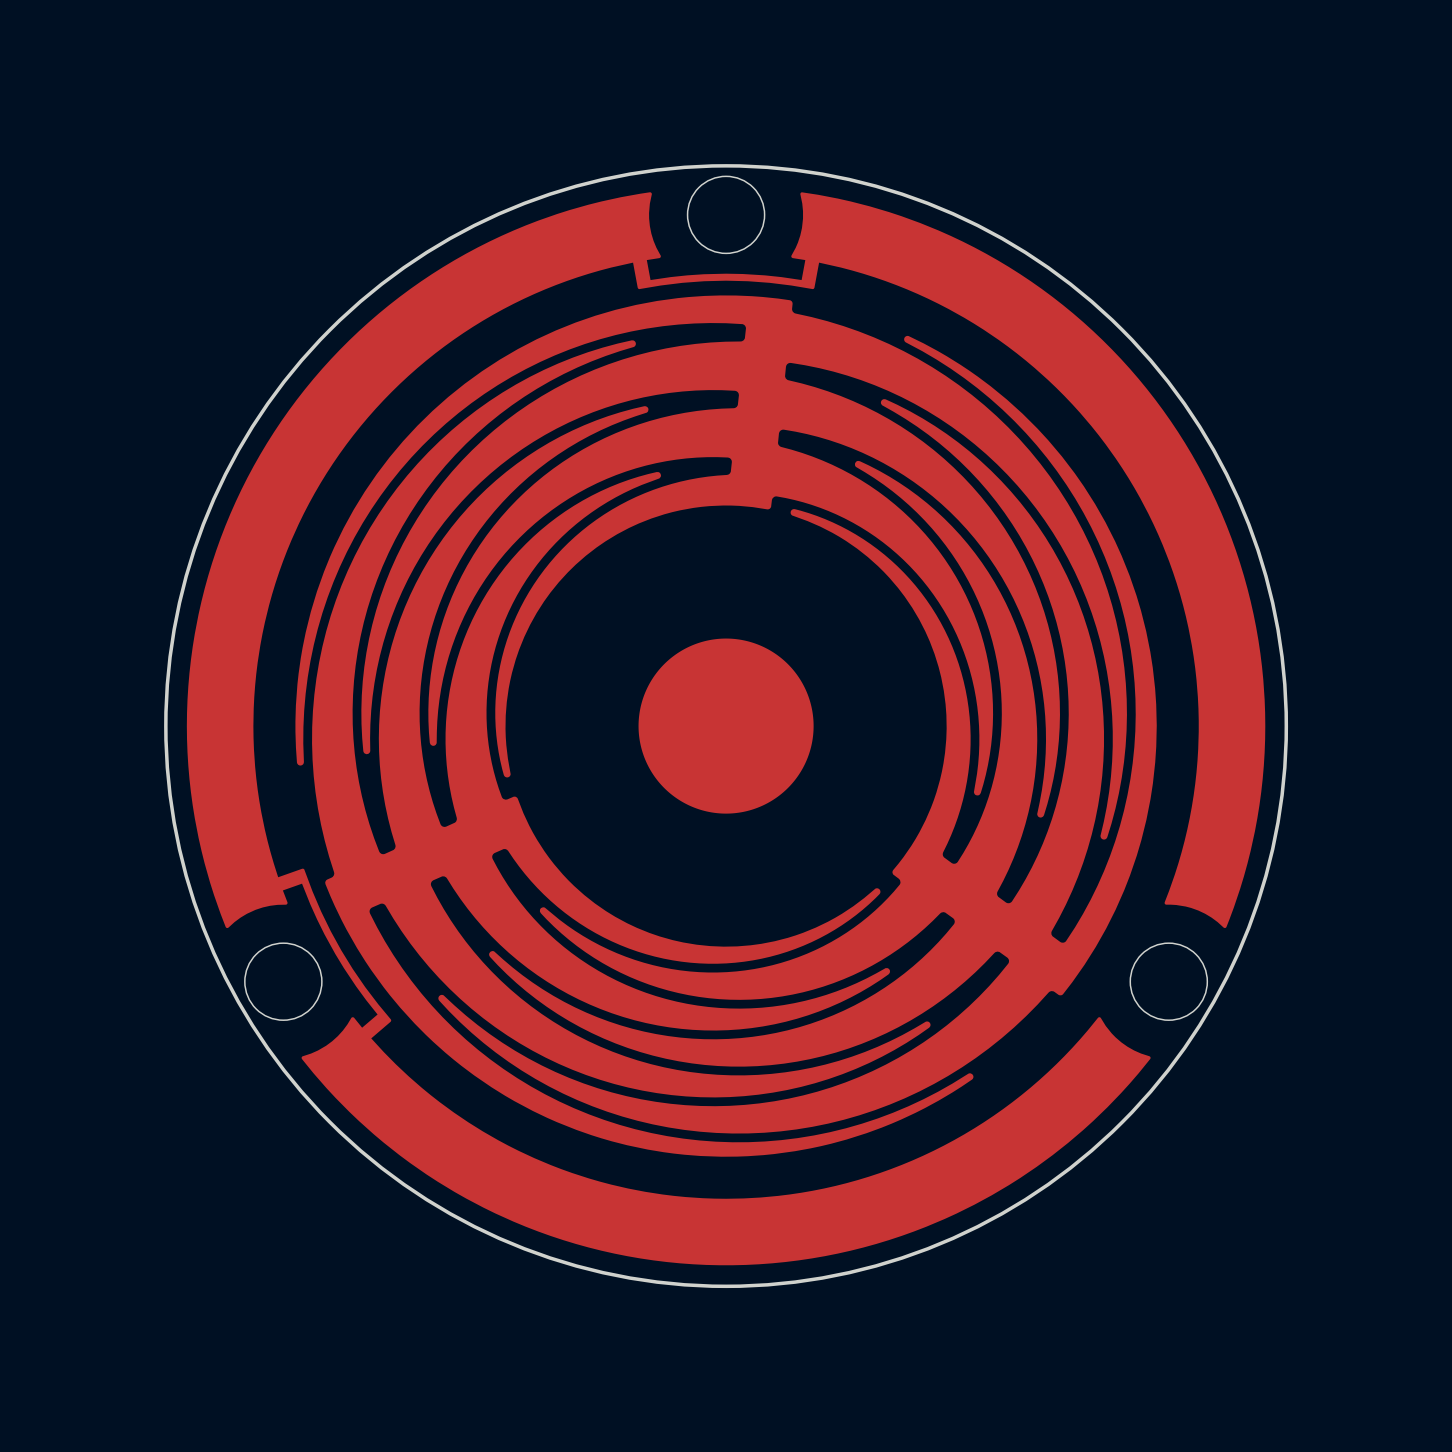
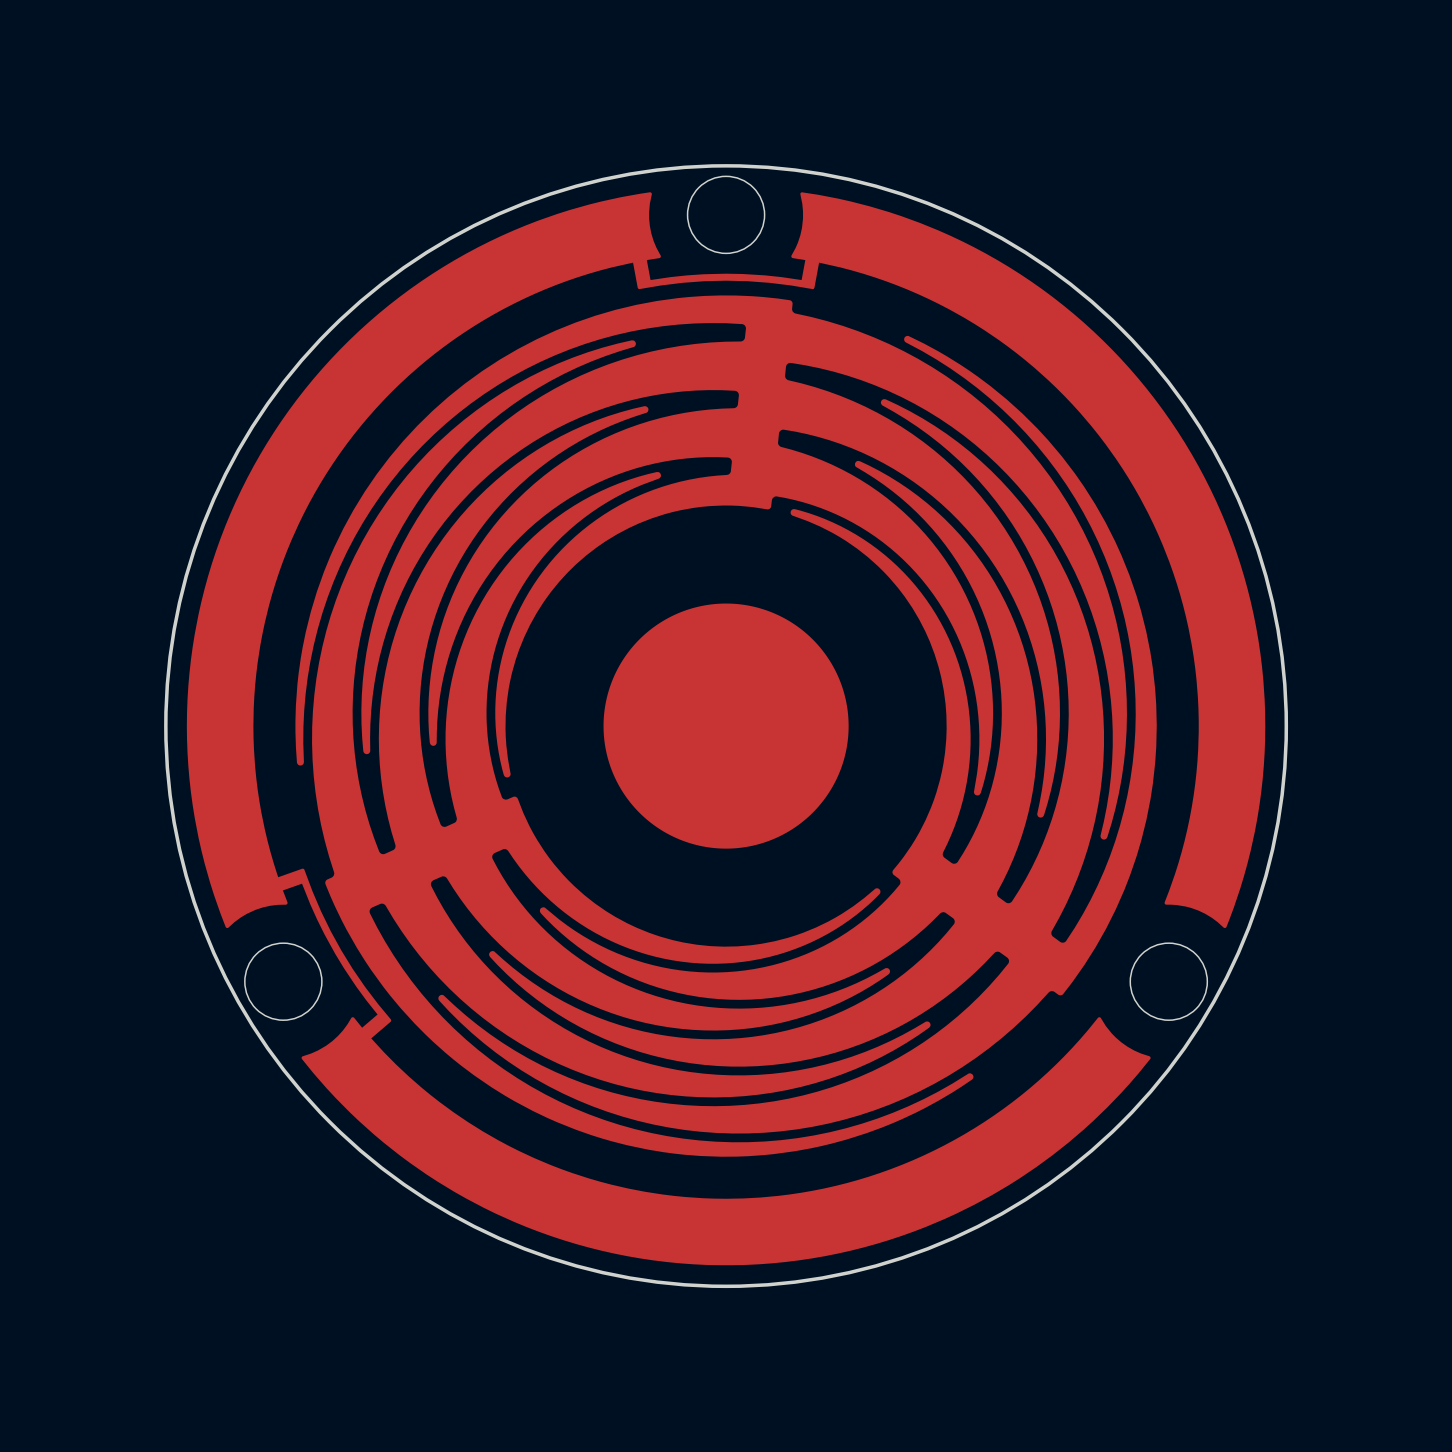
part footprint: [638, 638, 814, 814] -> [603, 603, 849, 849]

